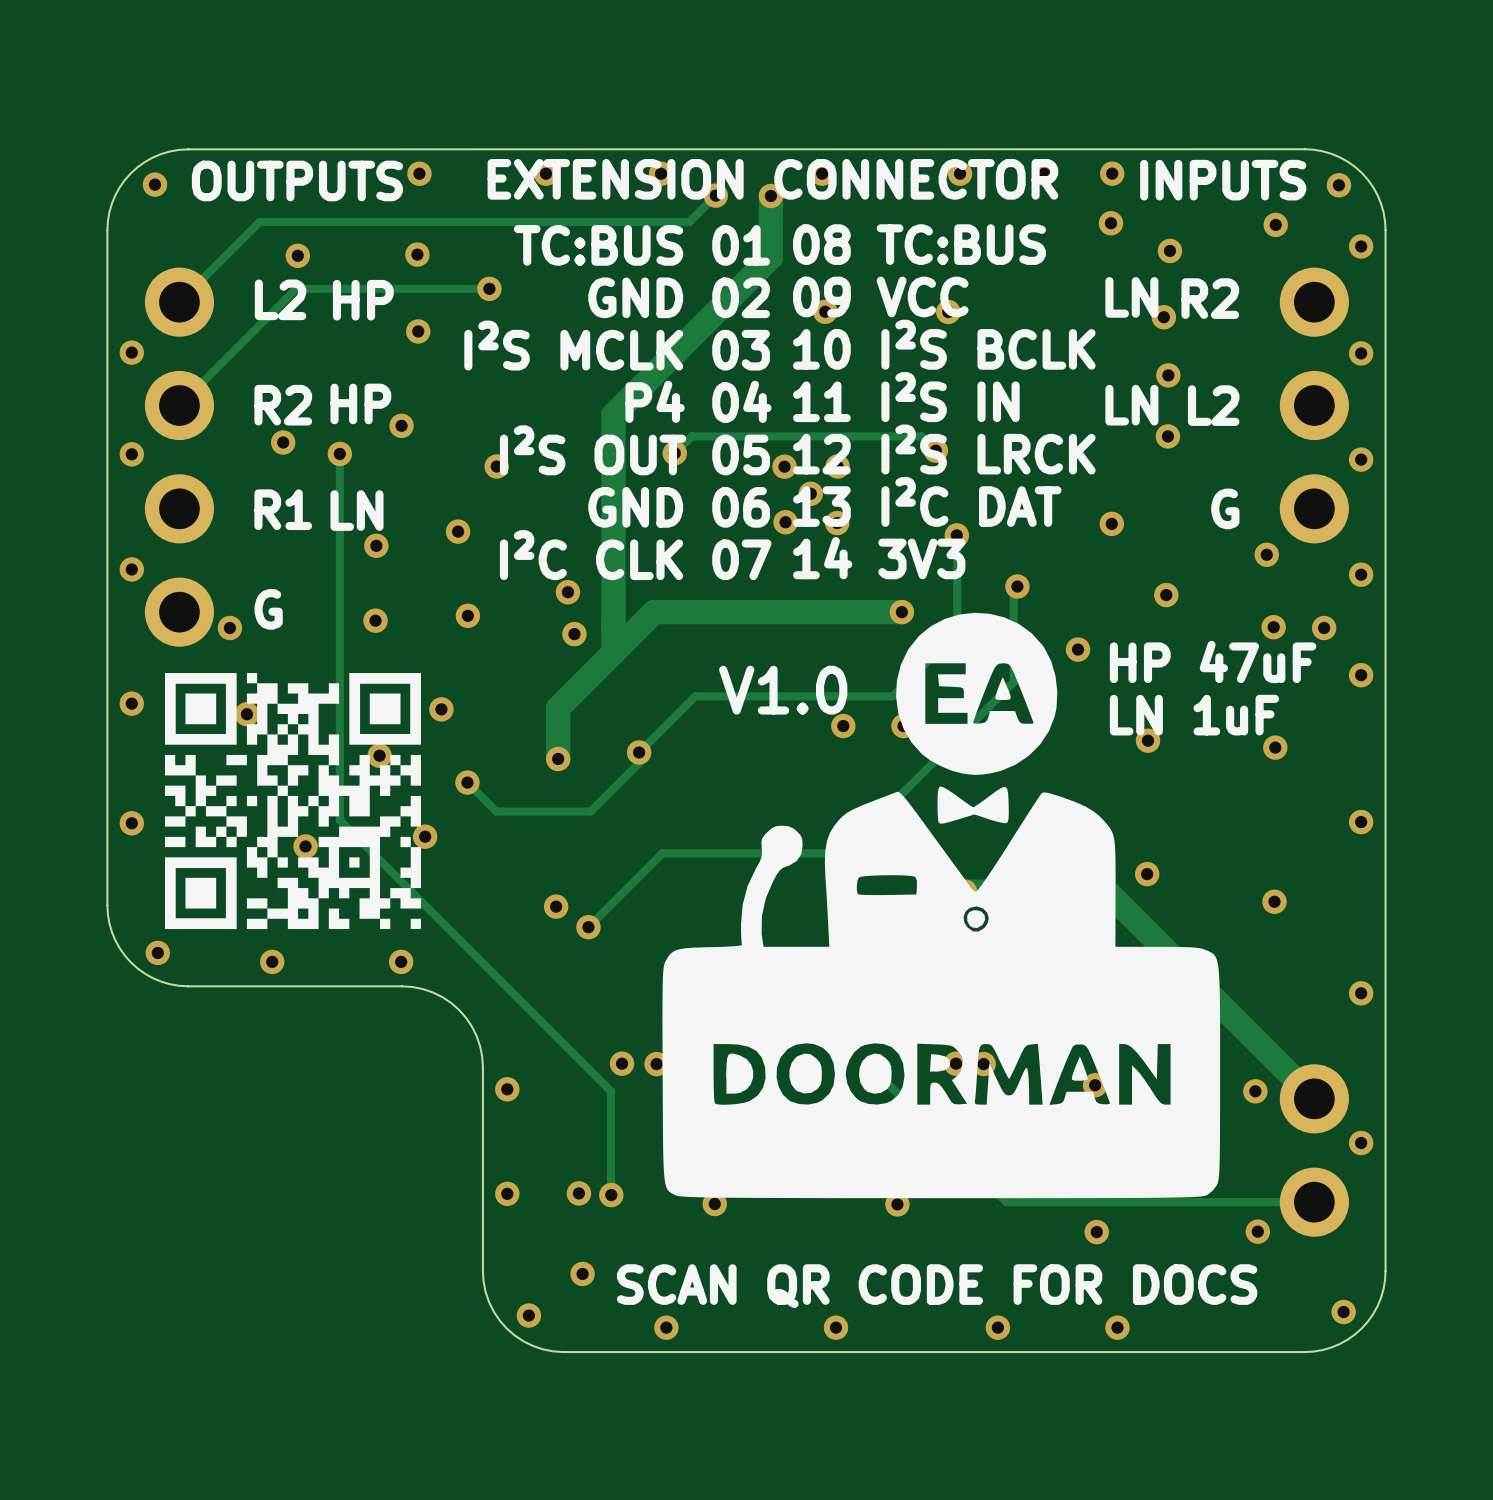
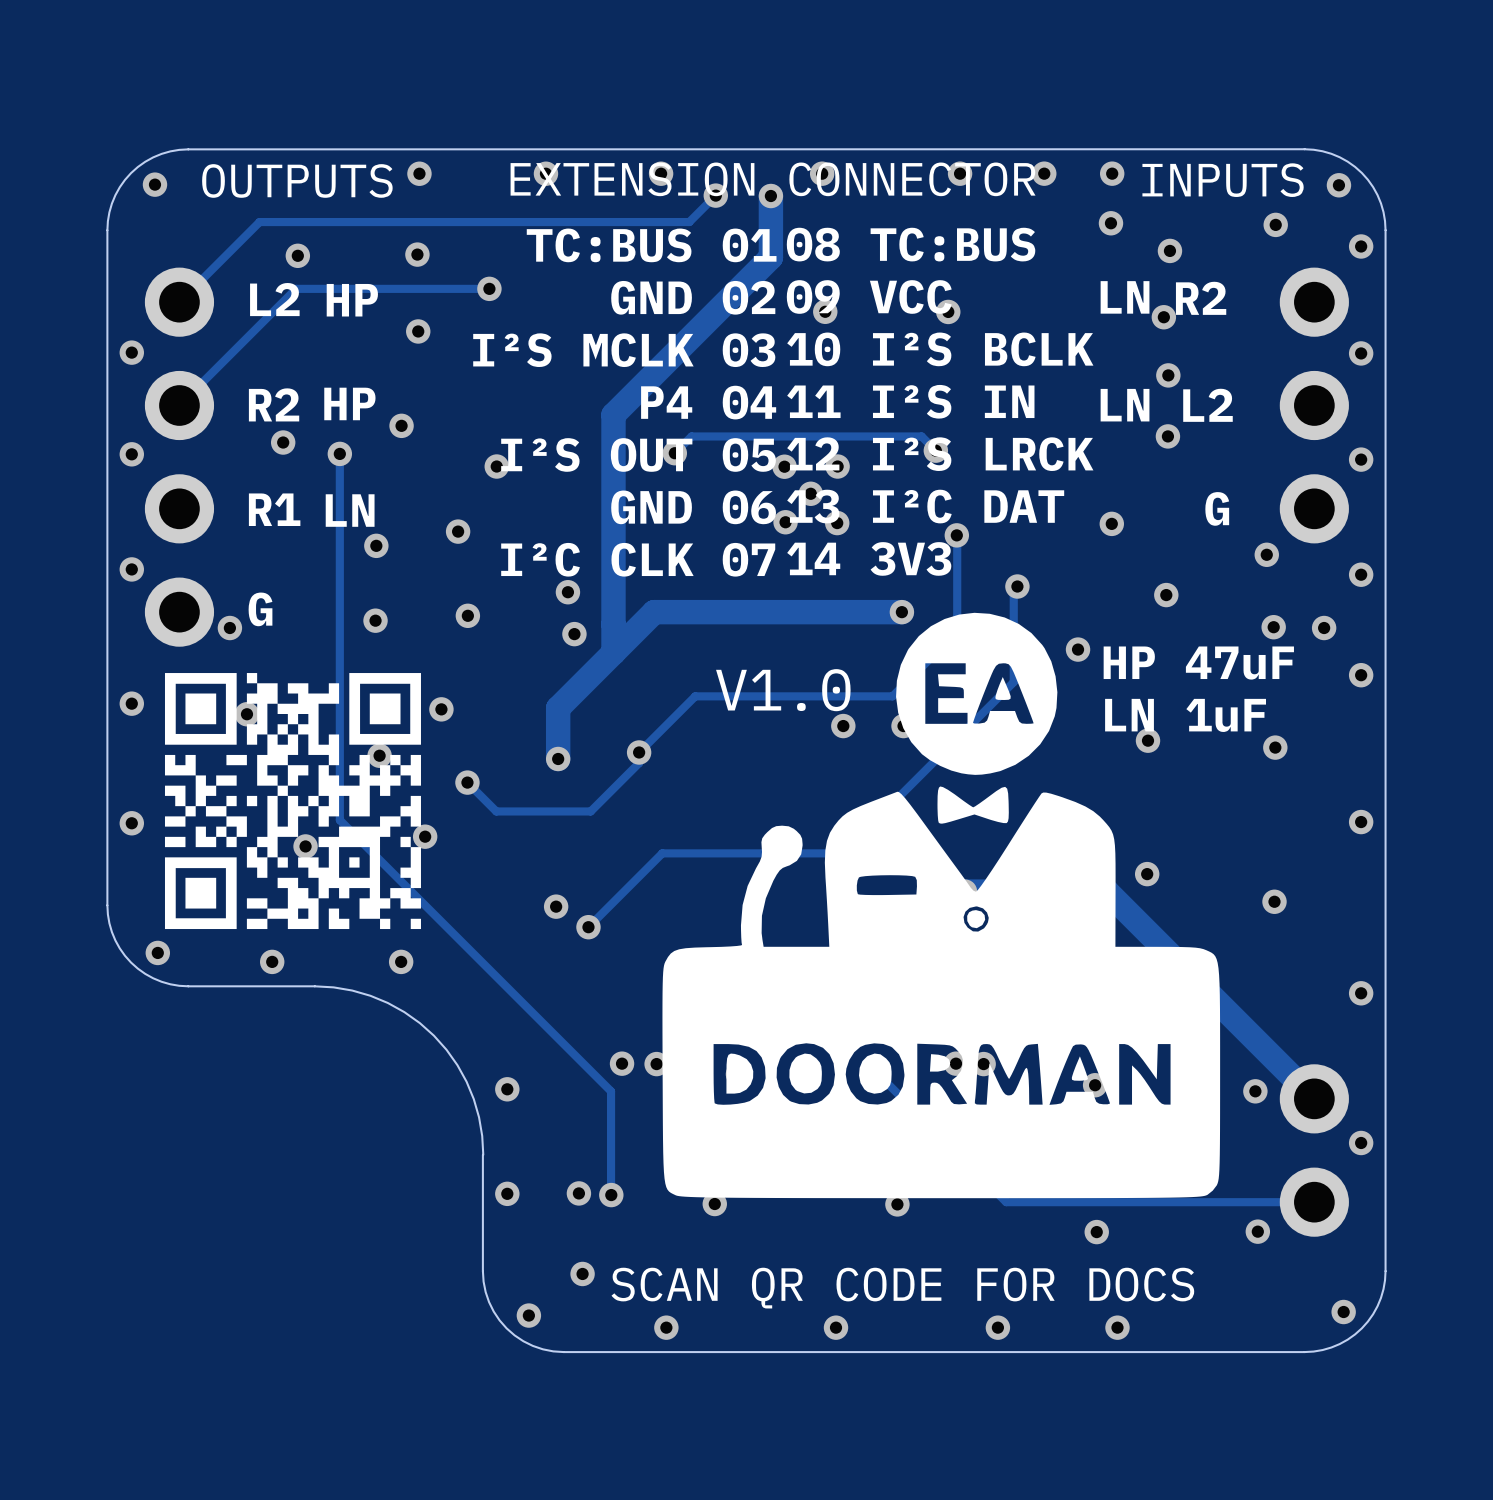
board edge: (314, 986) (412, 987) (442, 997) (459, 1010) (472, 1026) (482, 1056) (482, 1154) -> (314, 986) (333, 987) (370, 995) (404, 1012) (433, 1035) (446, 1049) (466, 1081) (479, 1117) (483, 1154)

